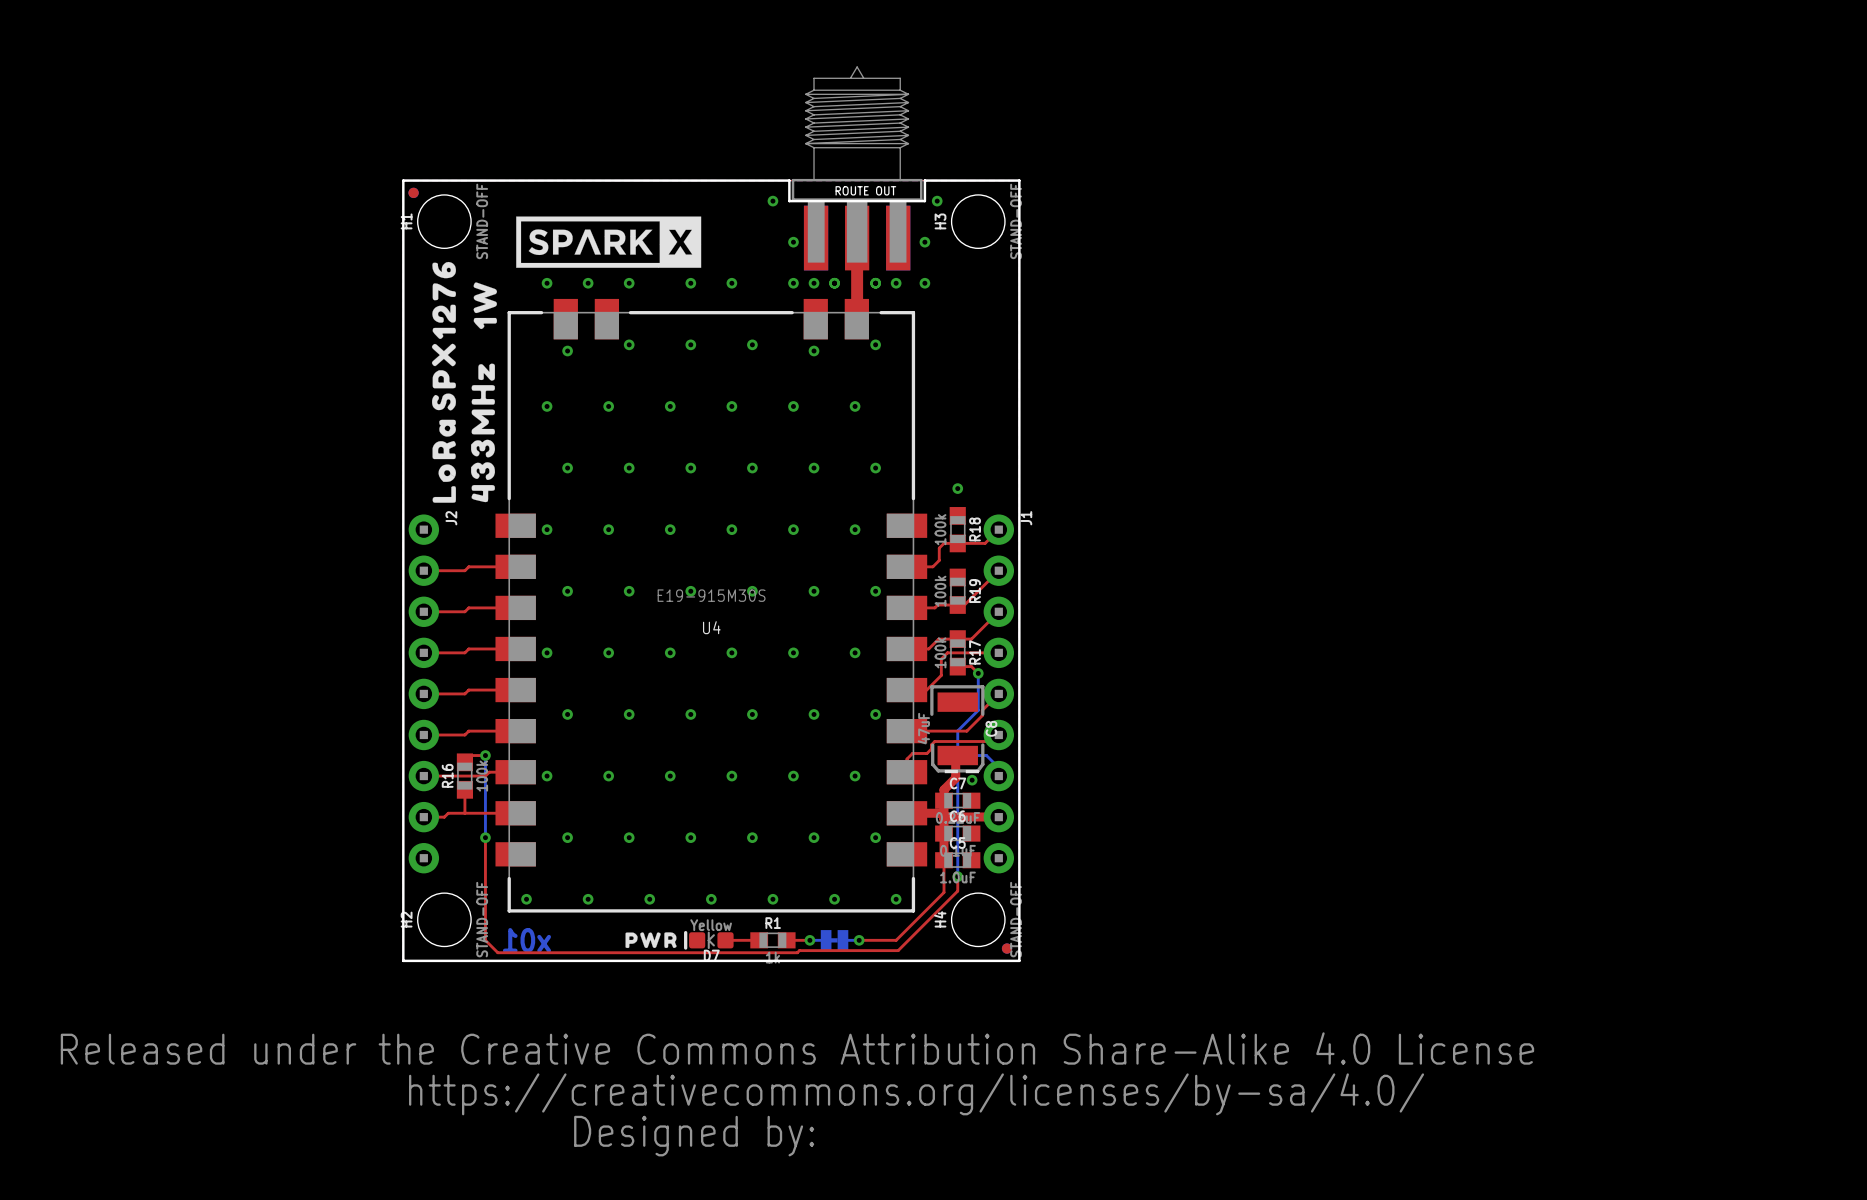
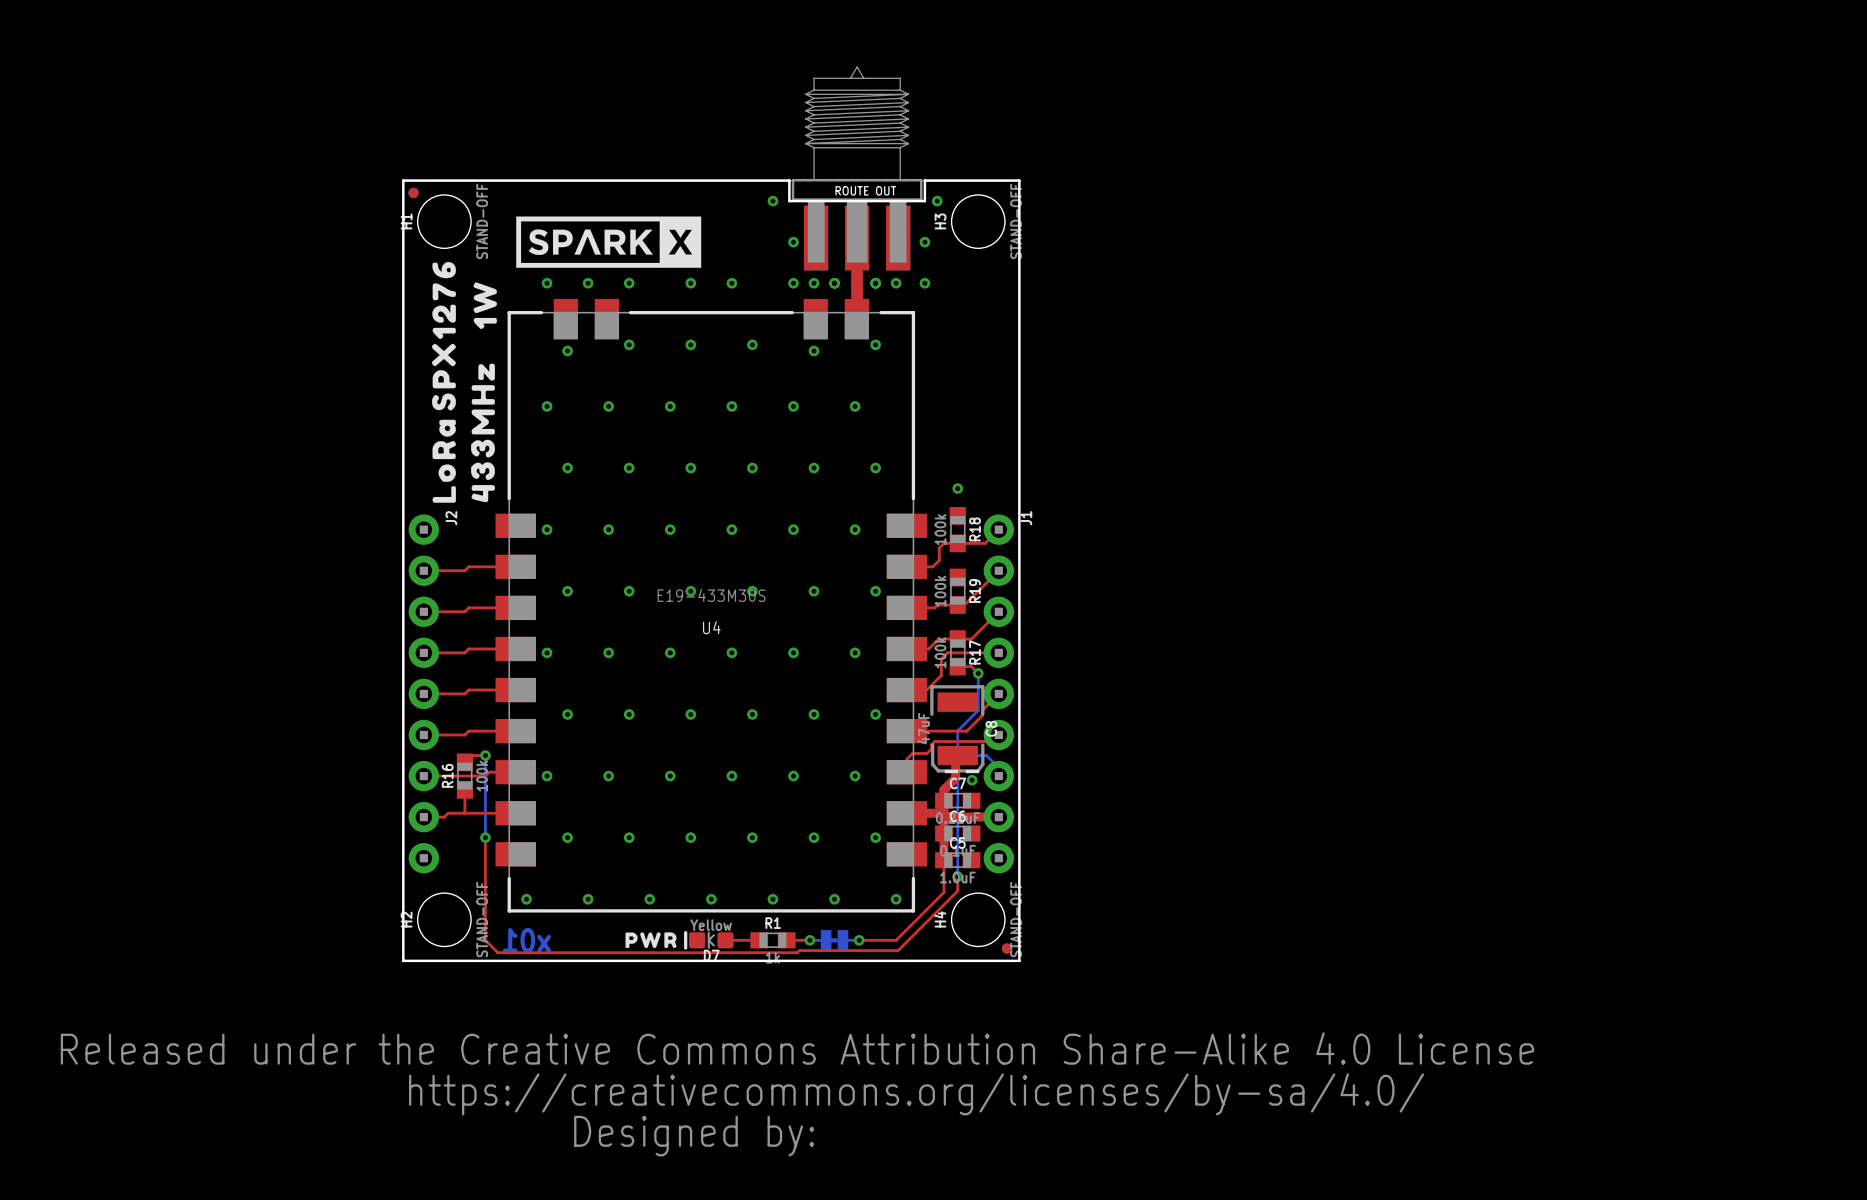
U4 value: E19-915M30S (711, 595) -> E19-433M30S (711, 595)

